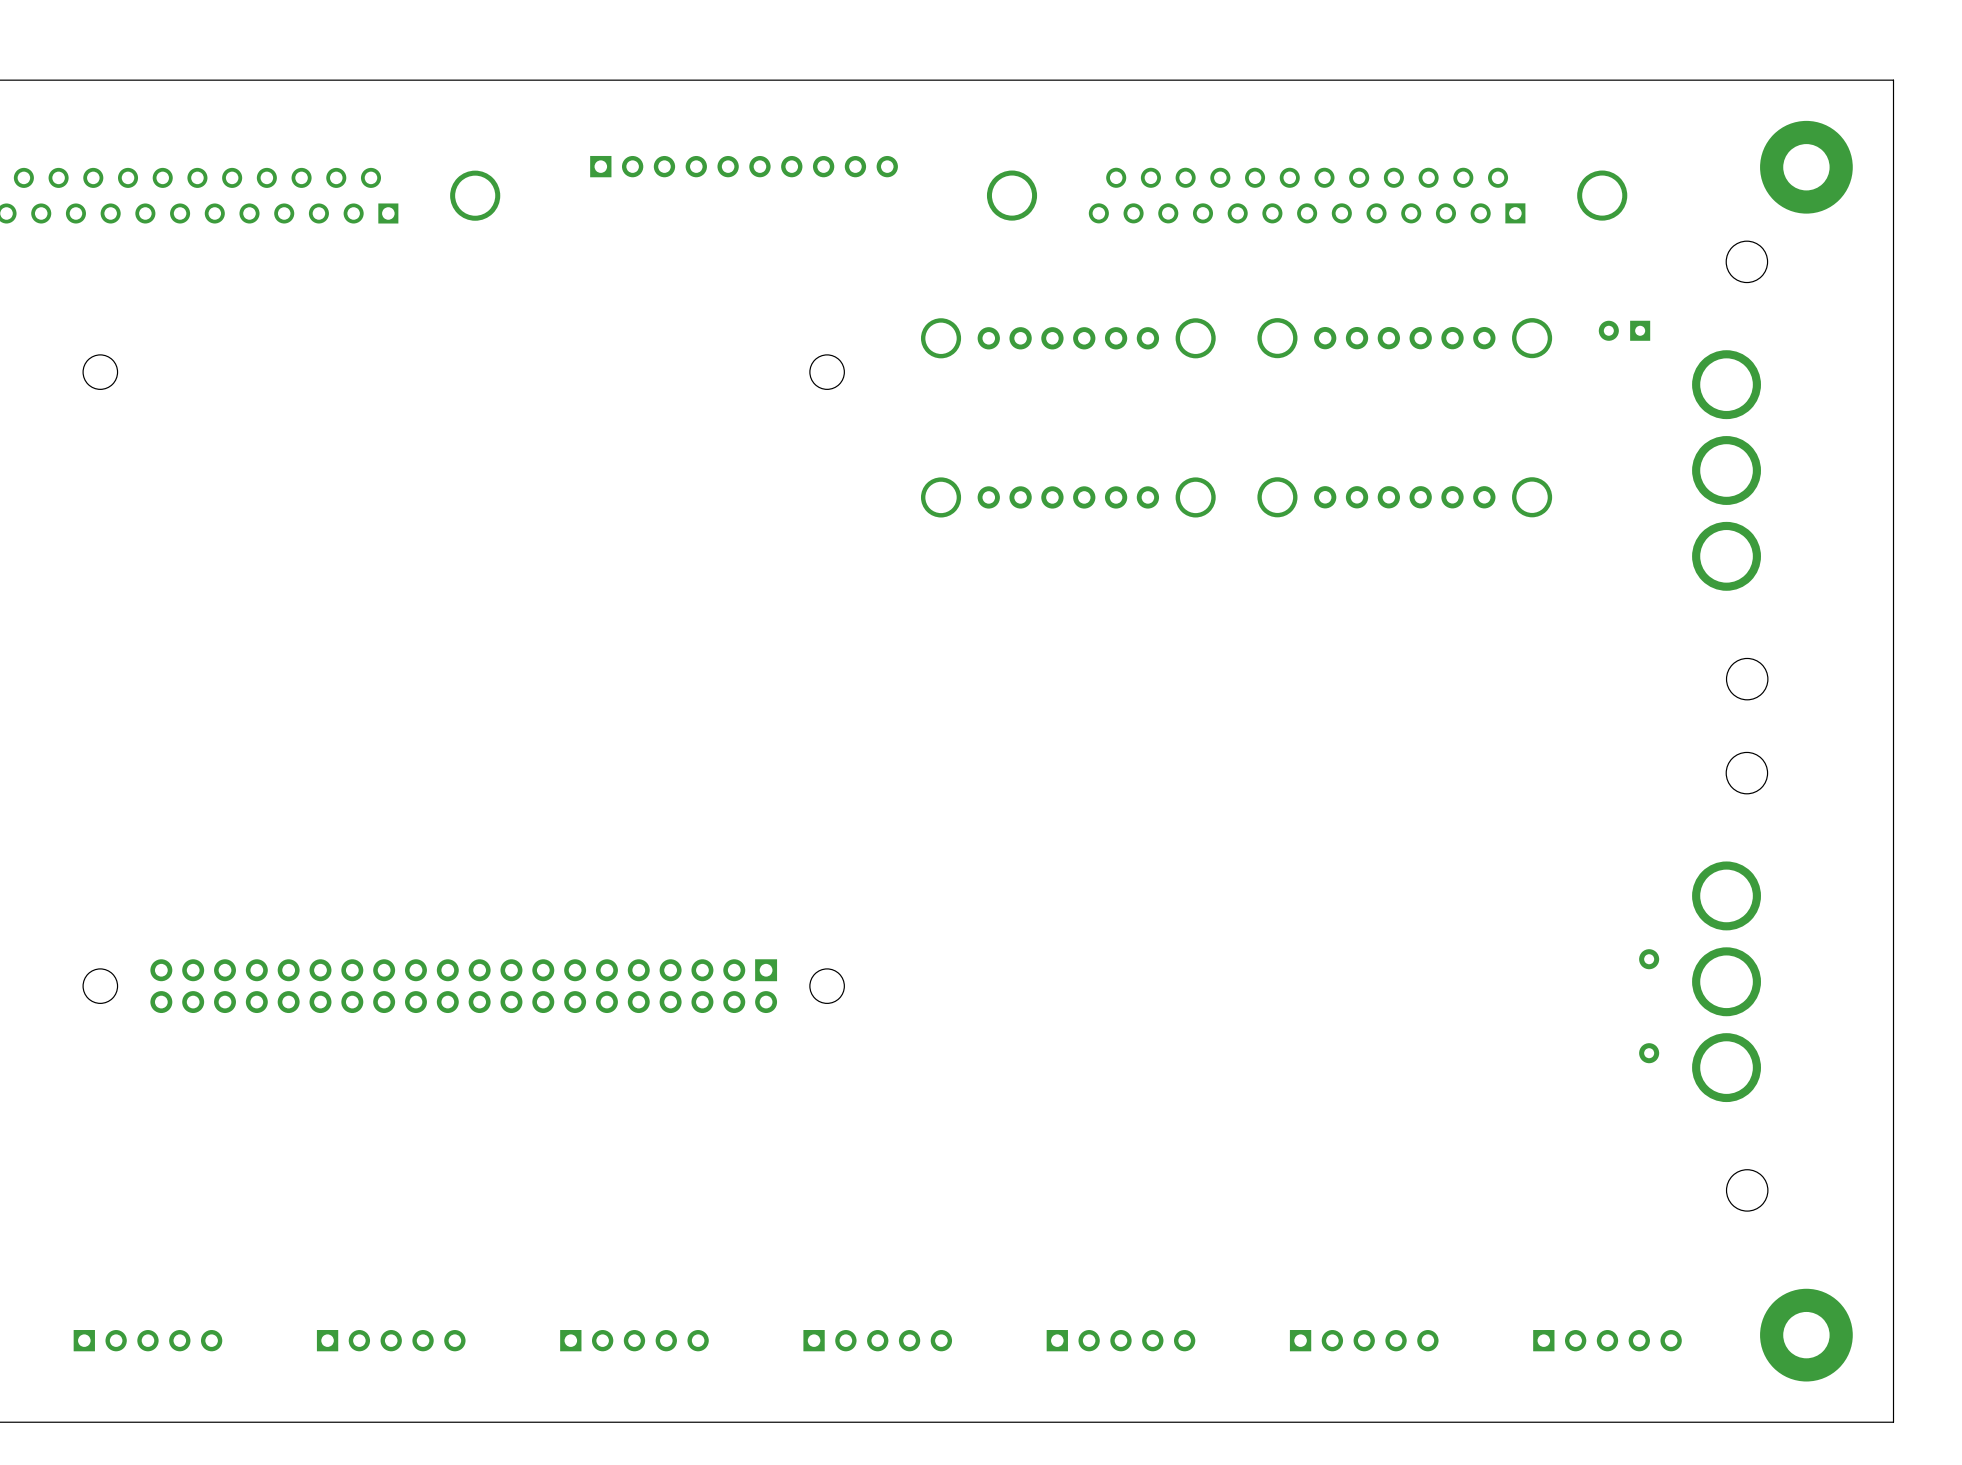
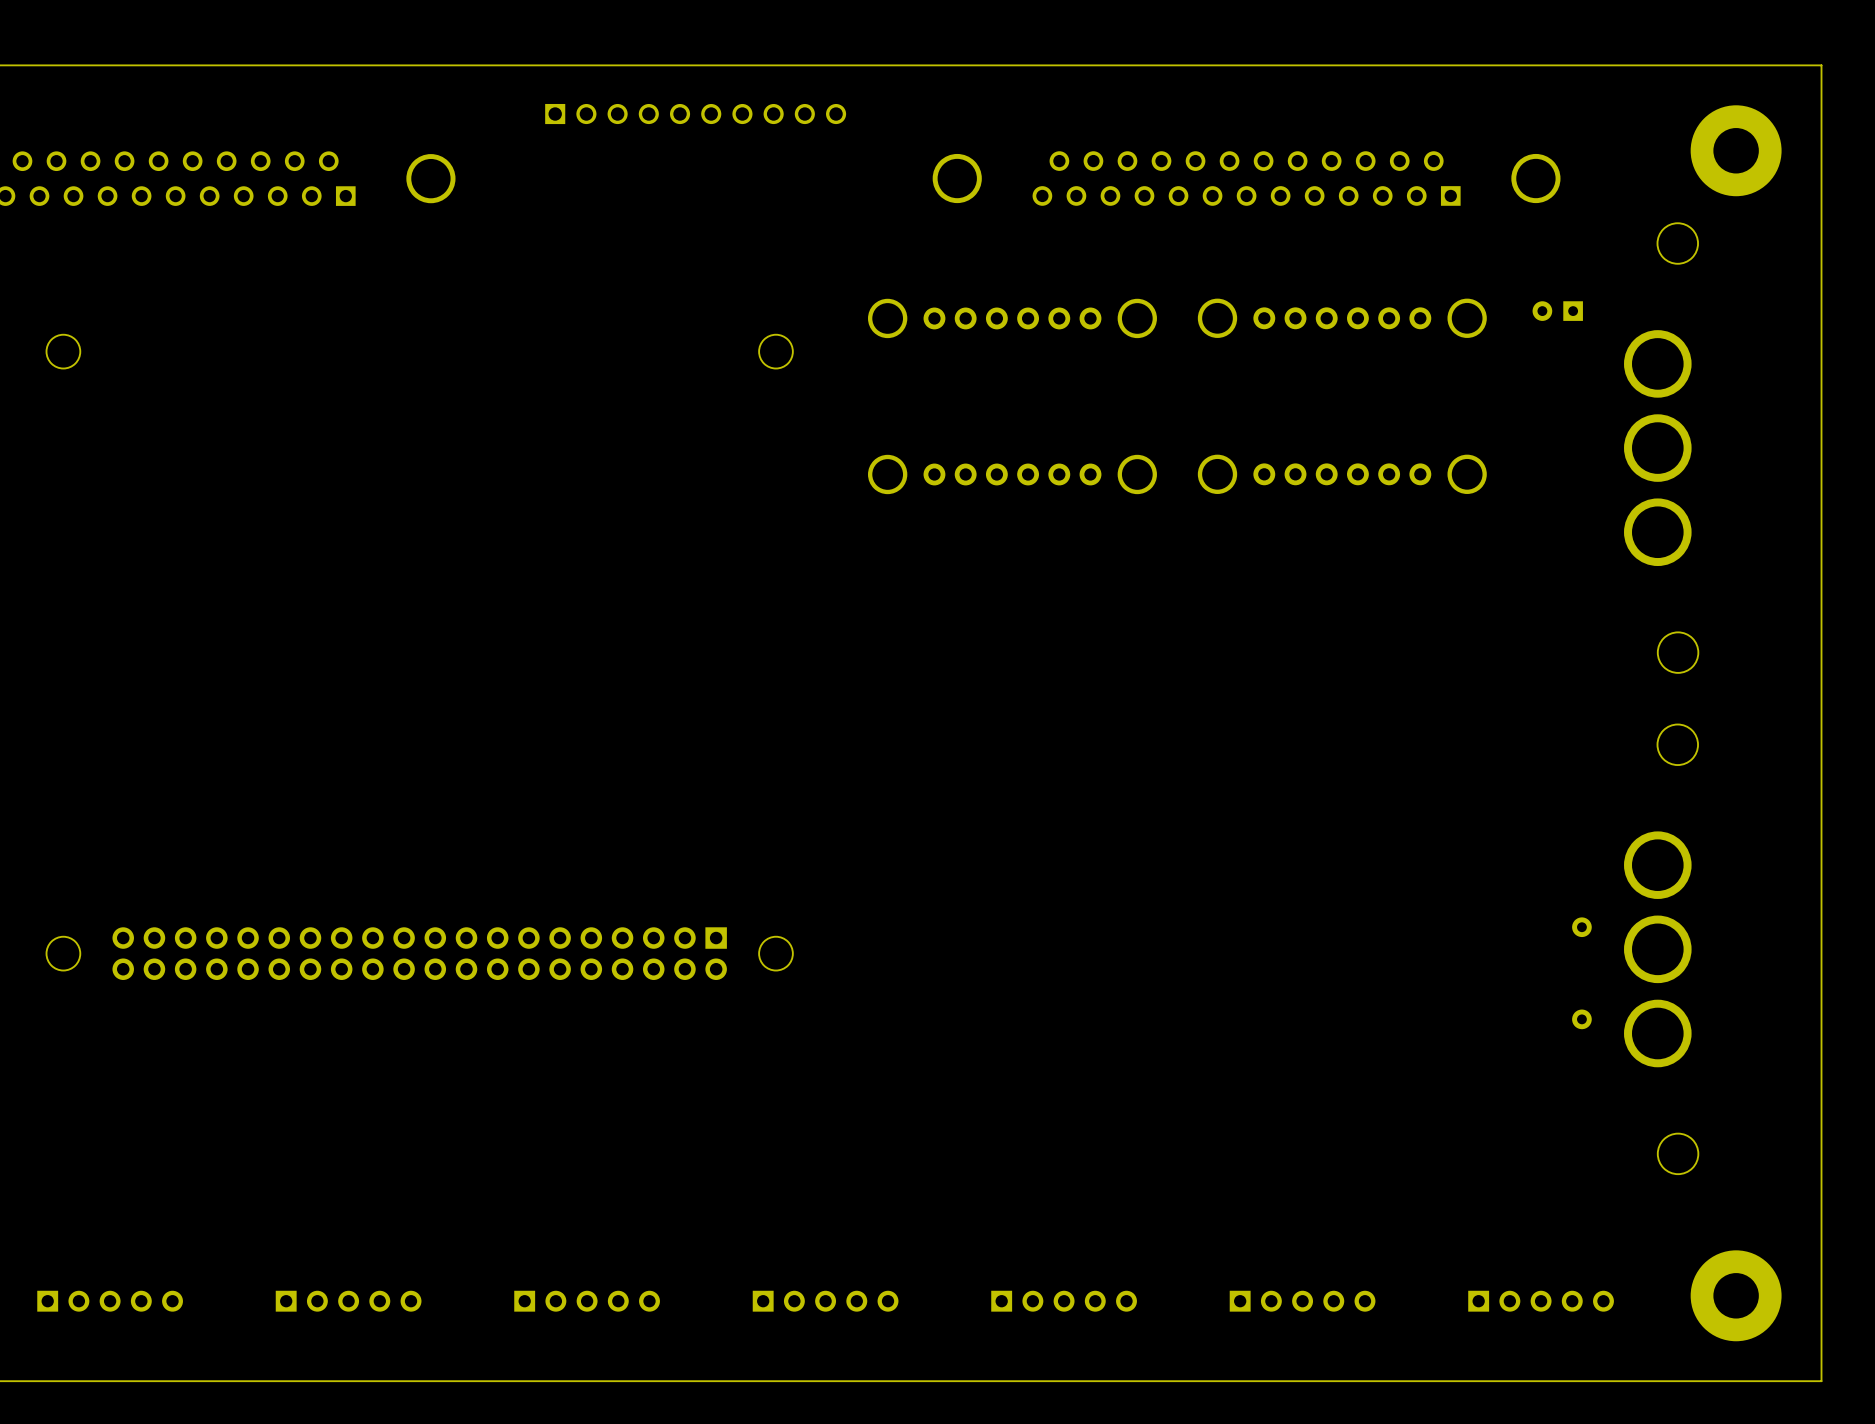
part: none -> (695, 114)
part: (744, 166) -> none

